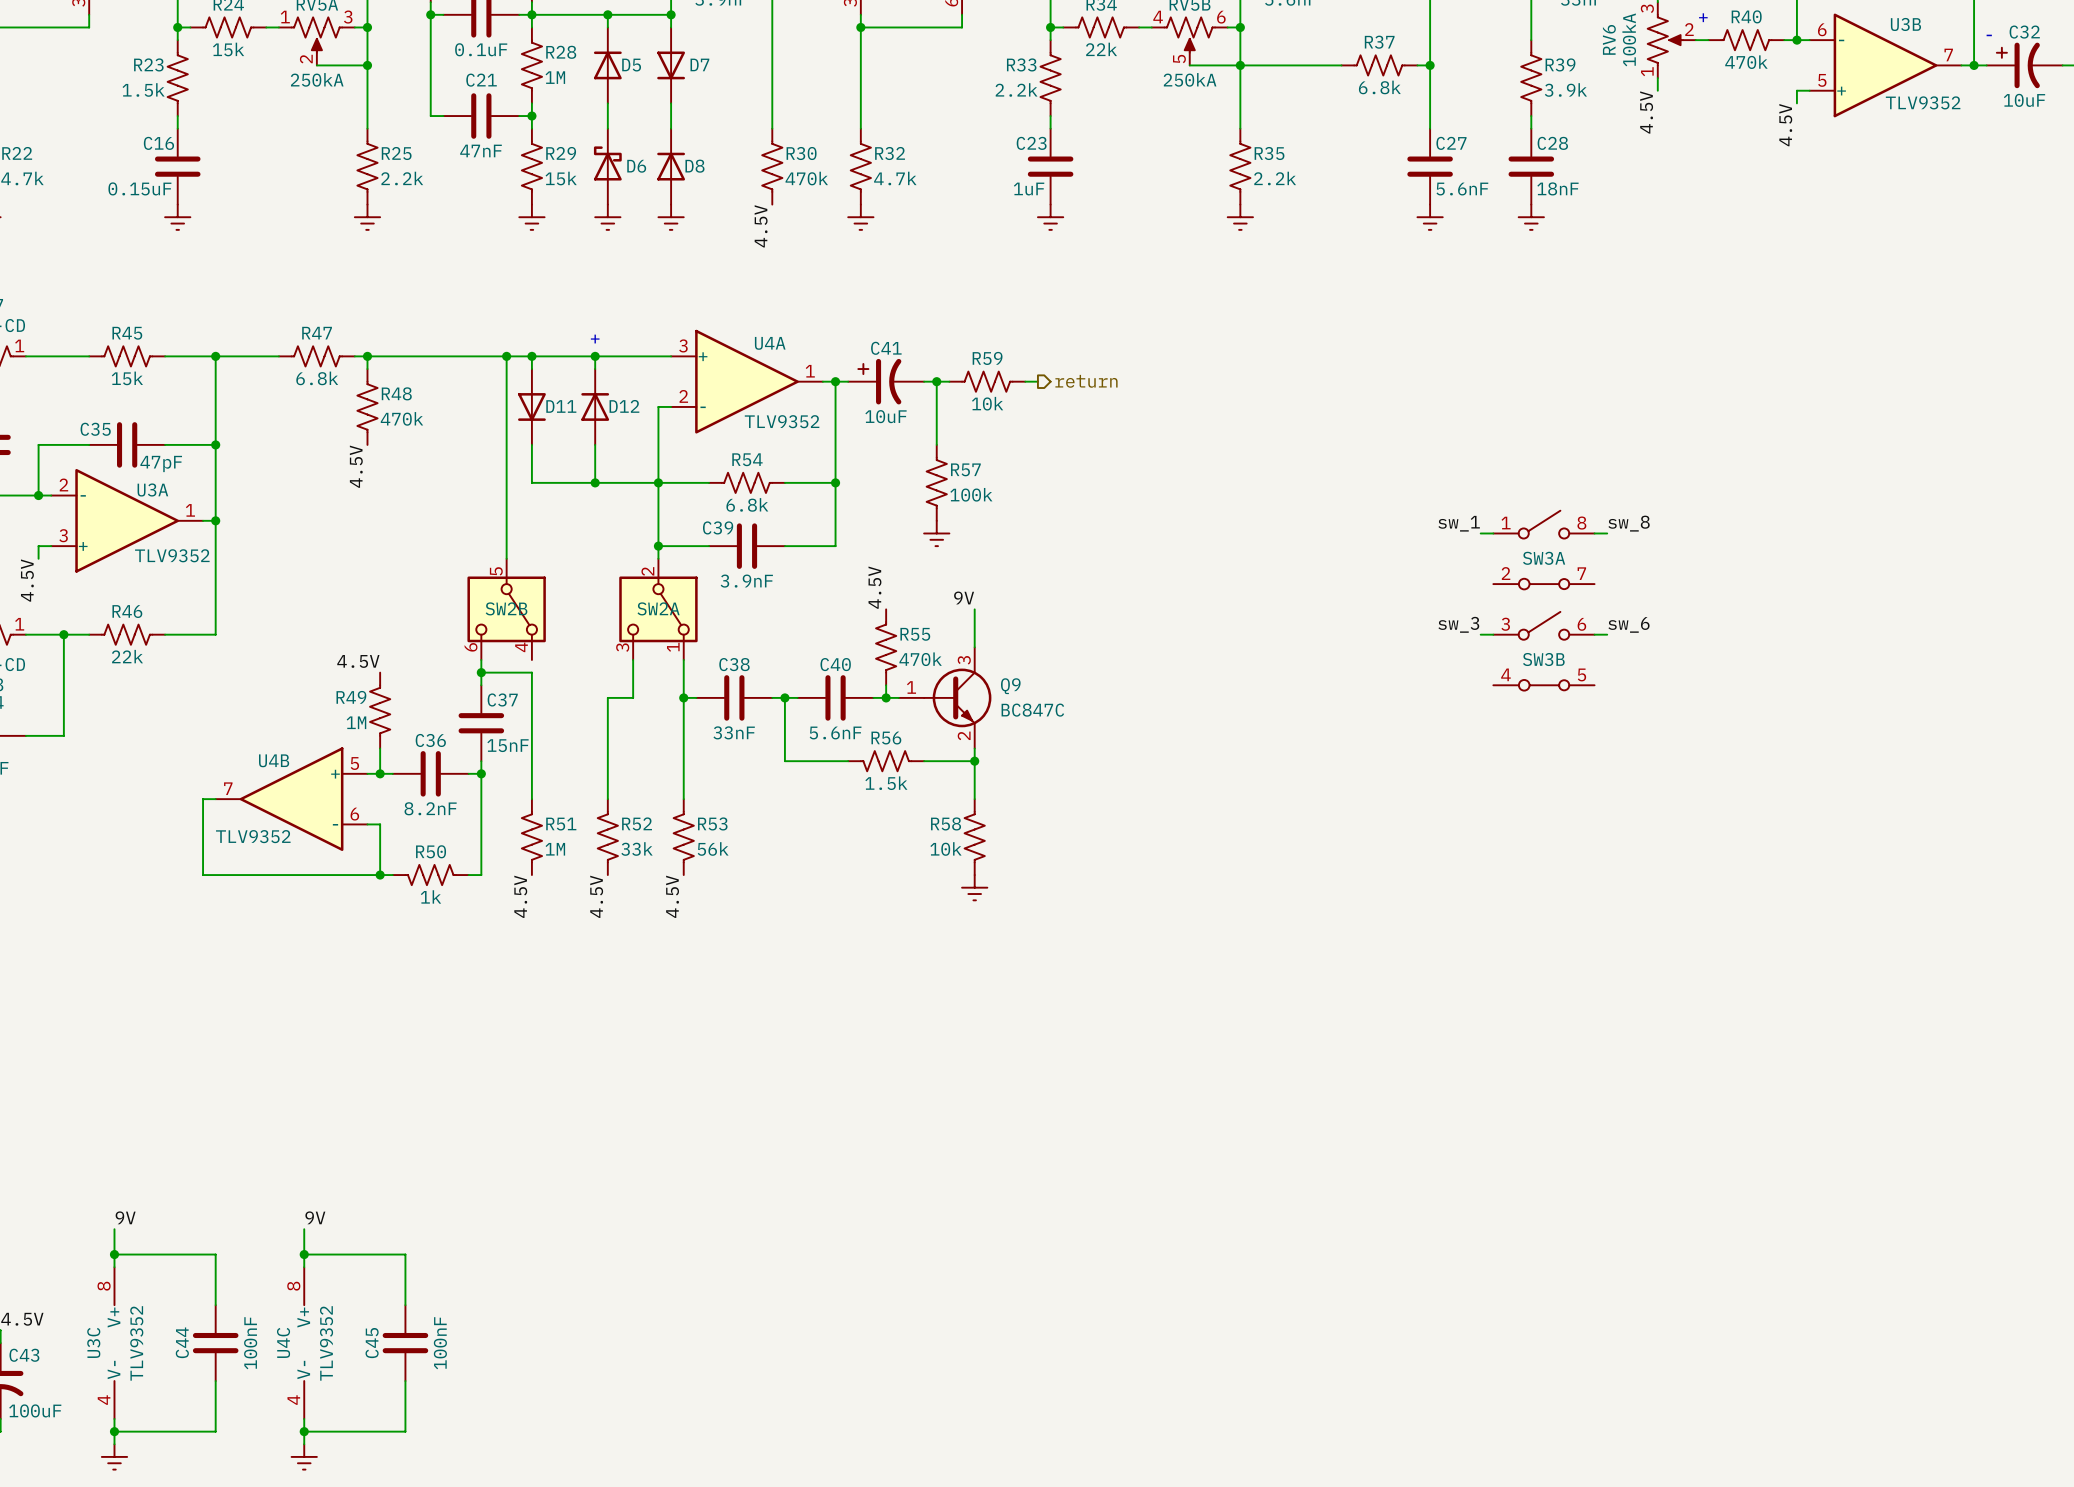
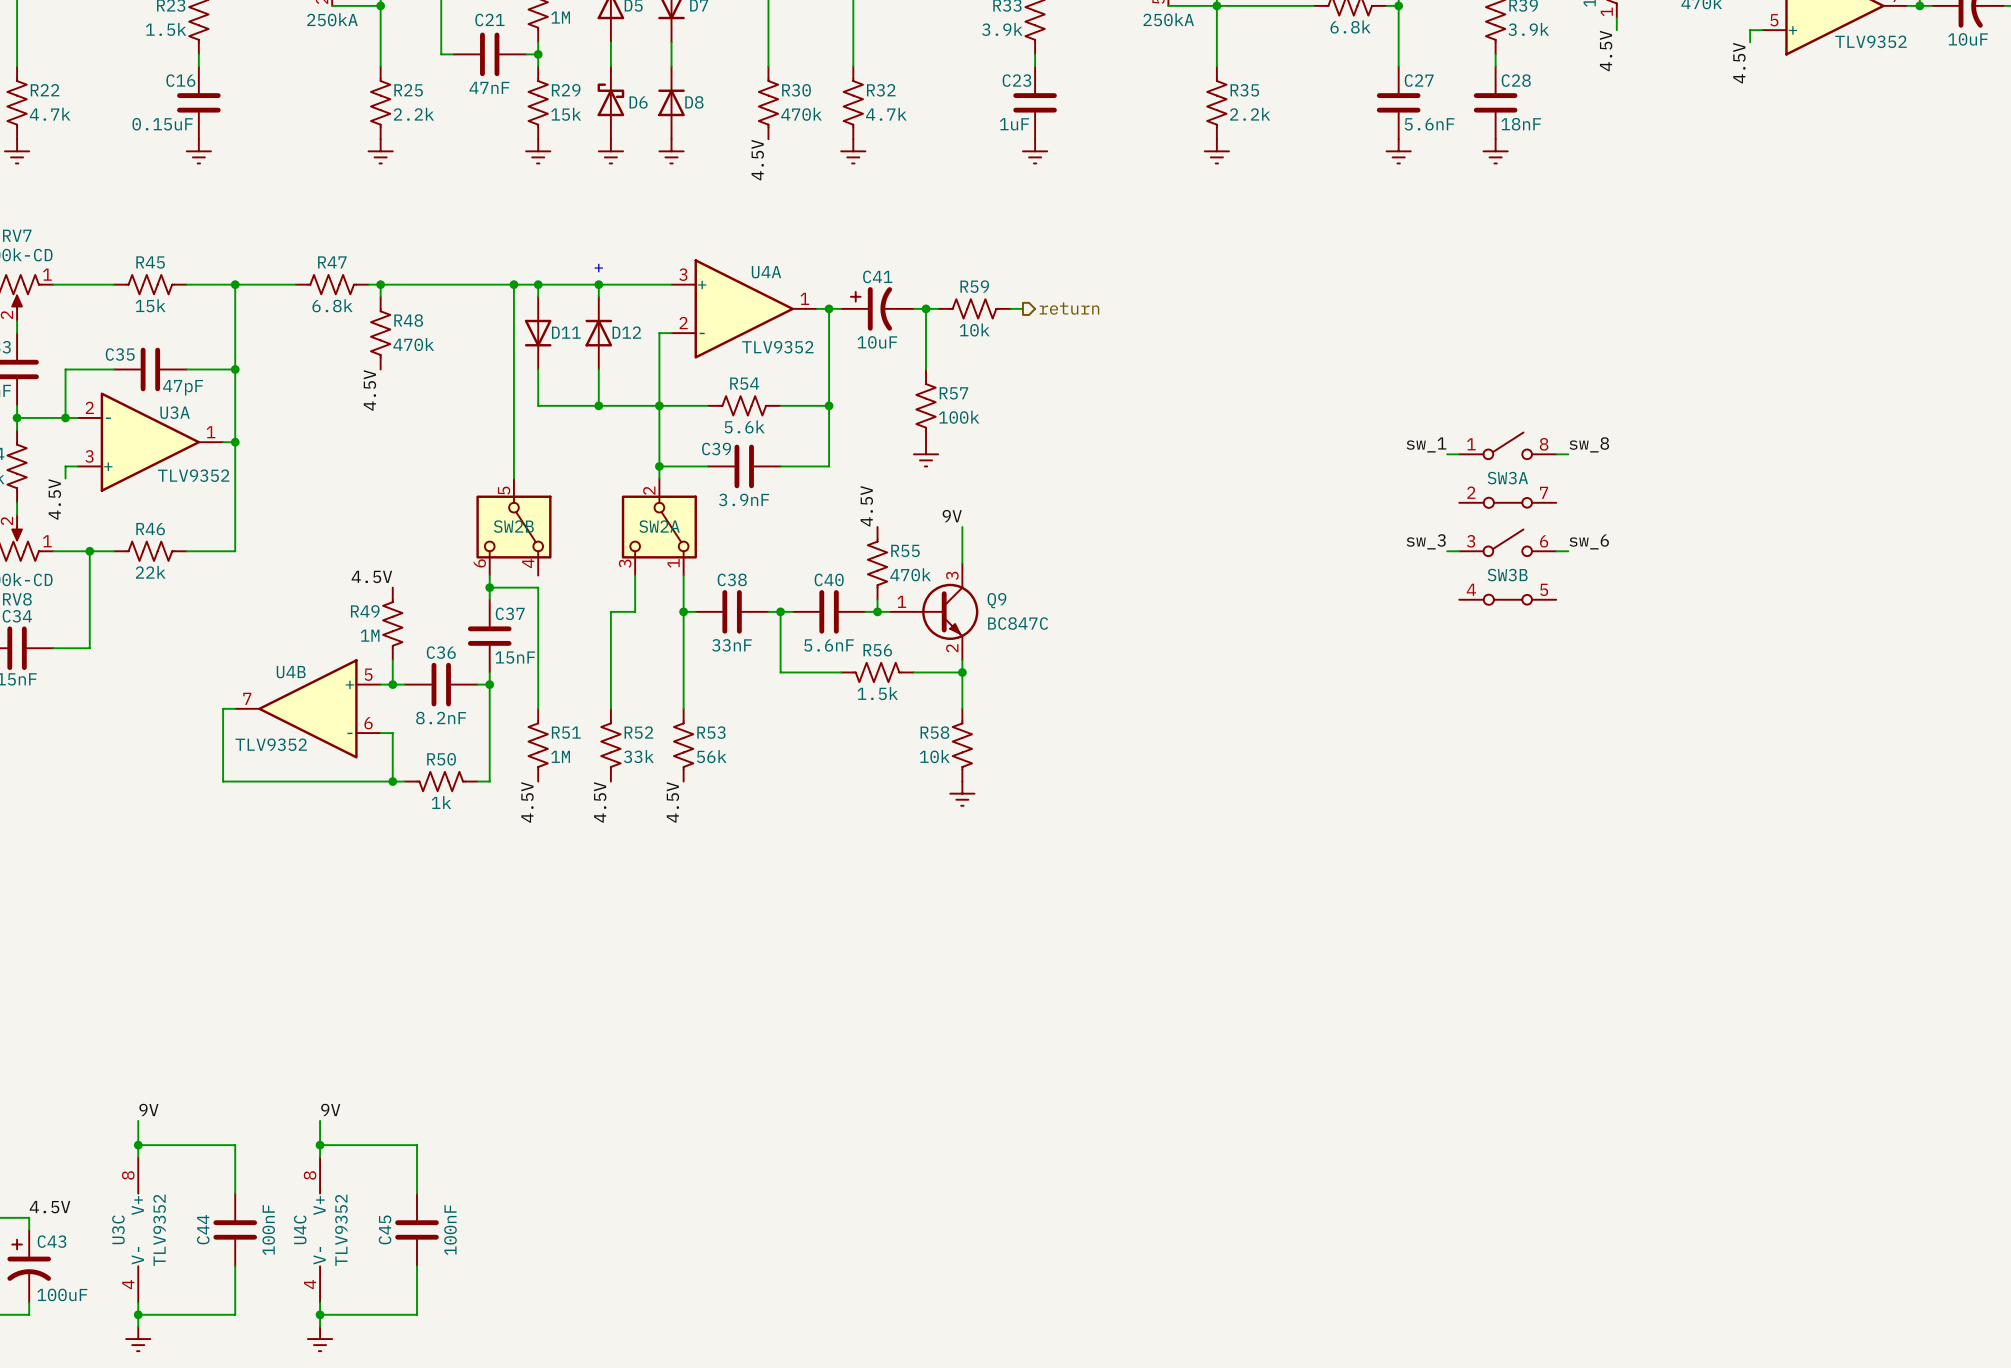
R33 value: 2.2k (1016, 89) -> 3.9k (1002, 29)
R54 value: 6.8k (747, 504) -> 5.6k (744, 426)

